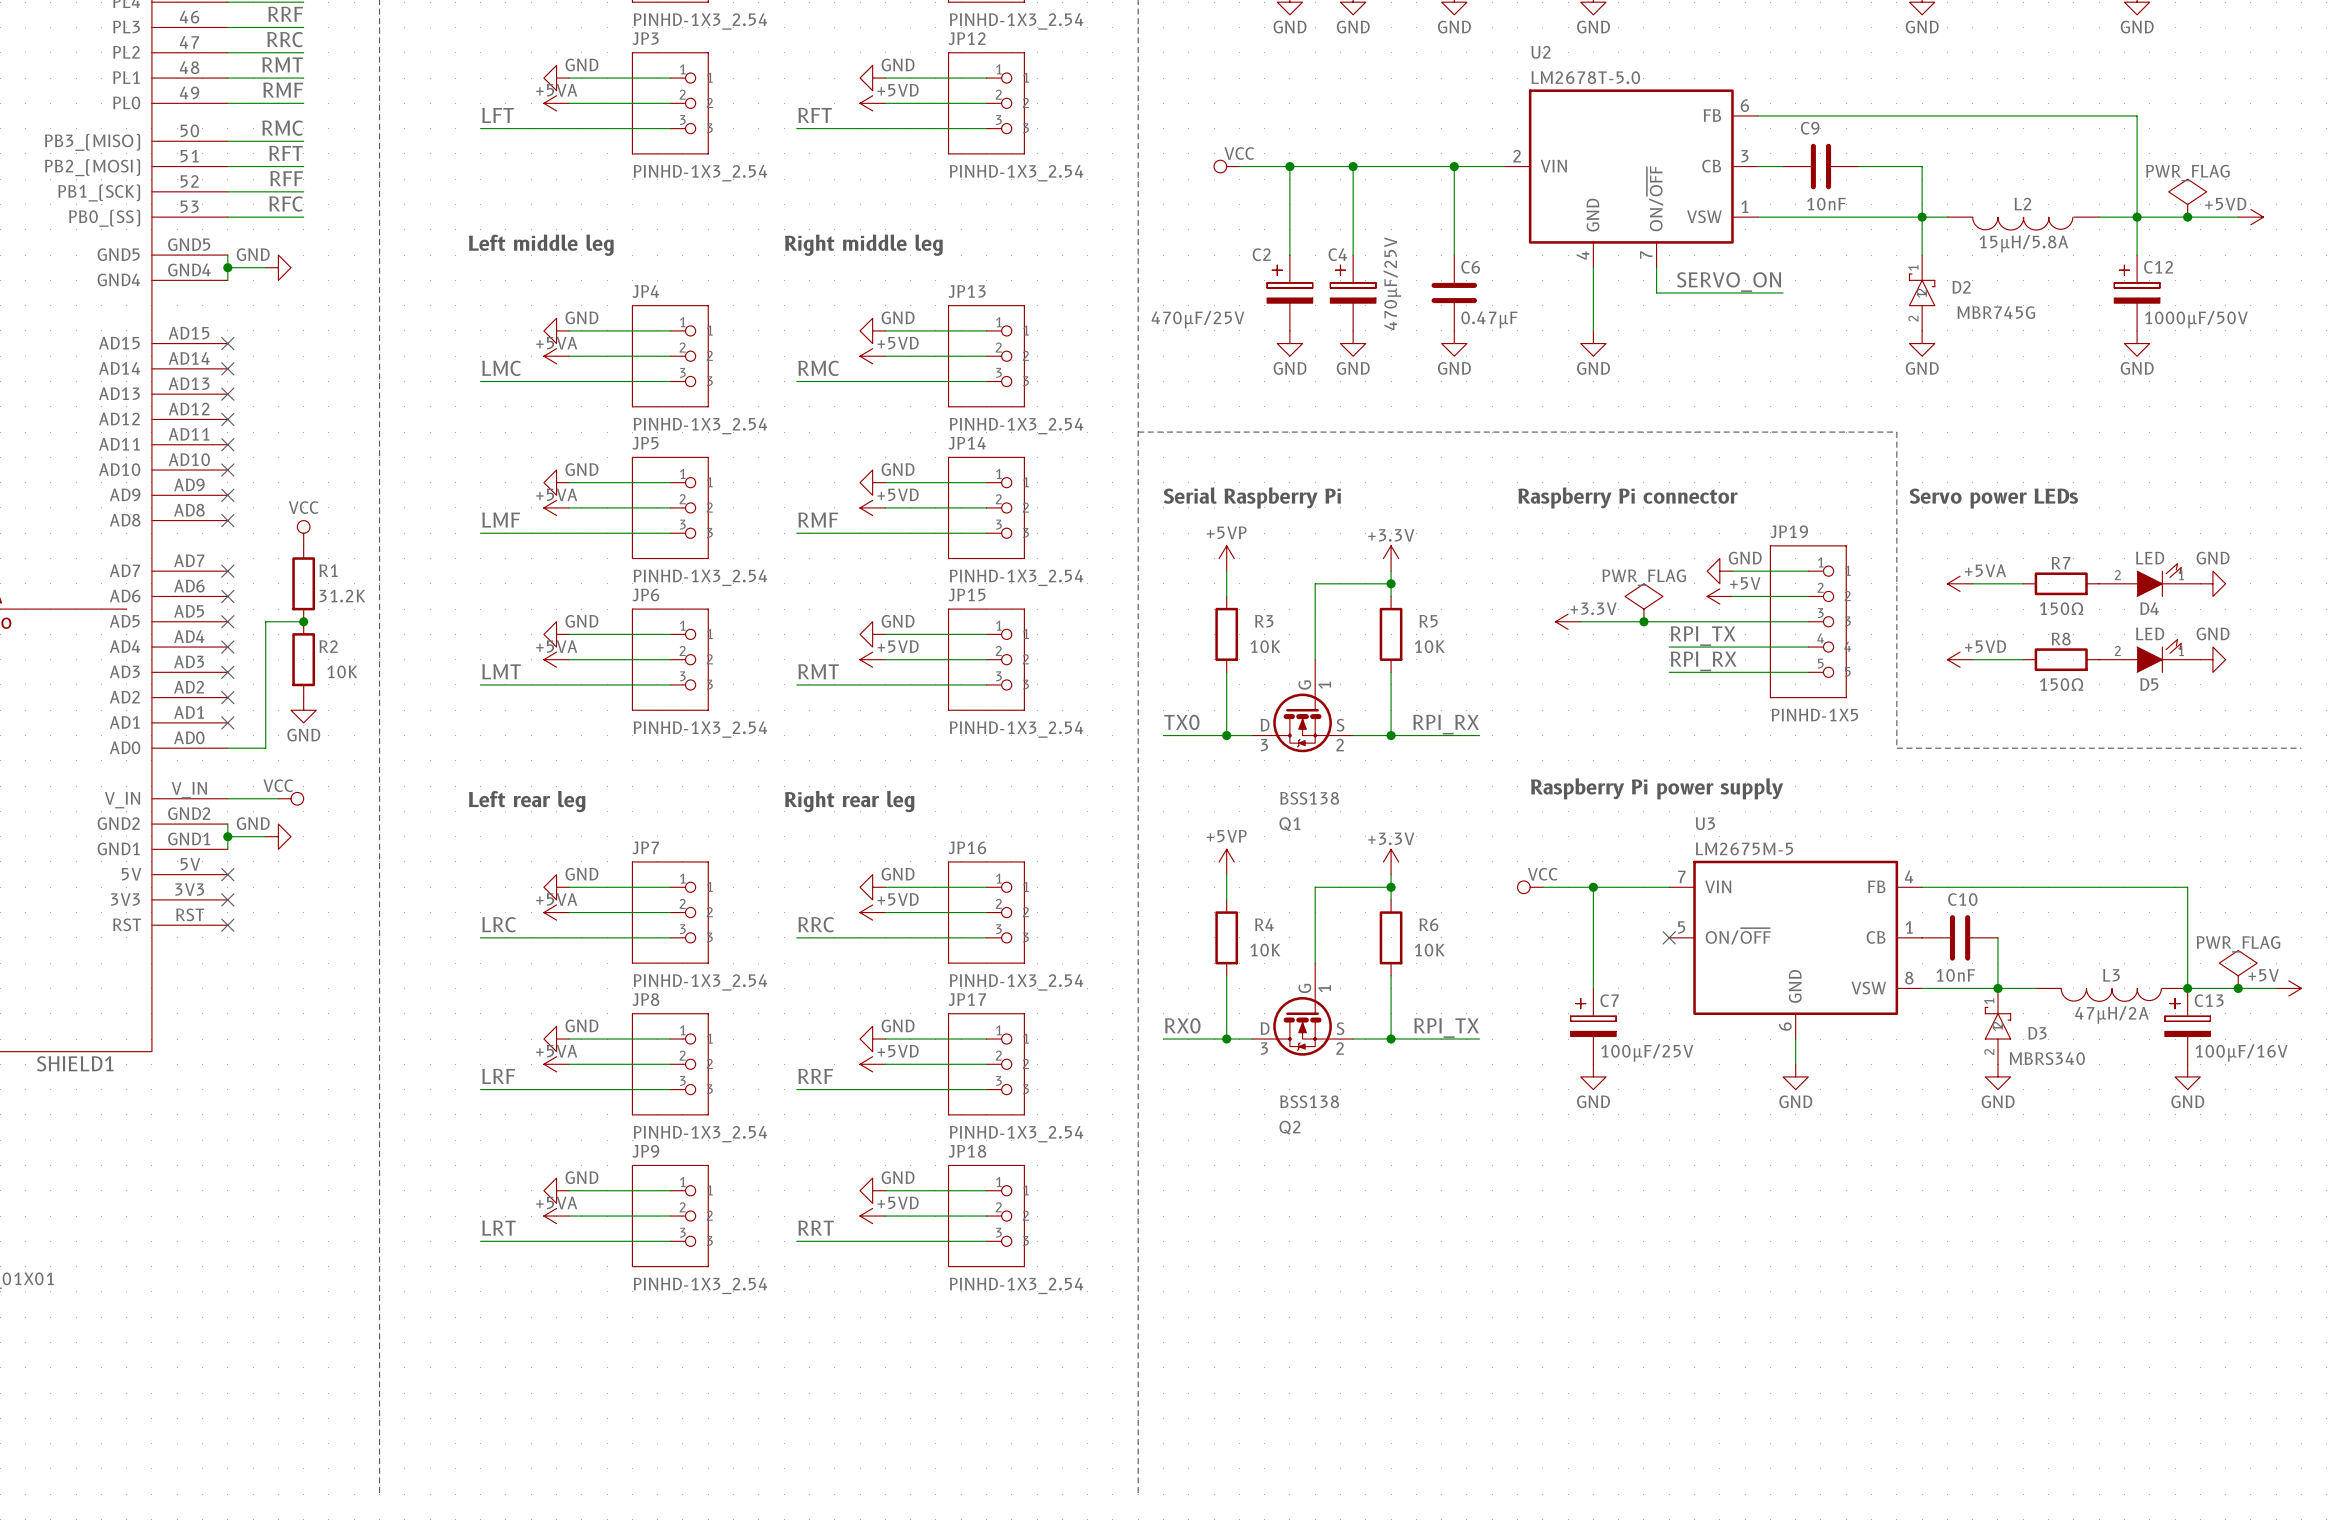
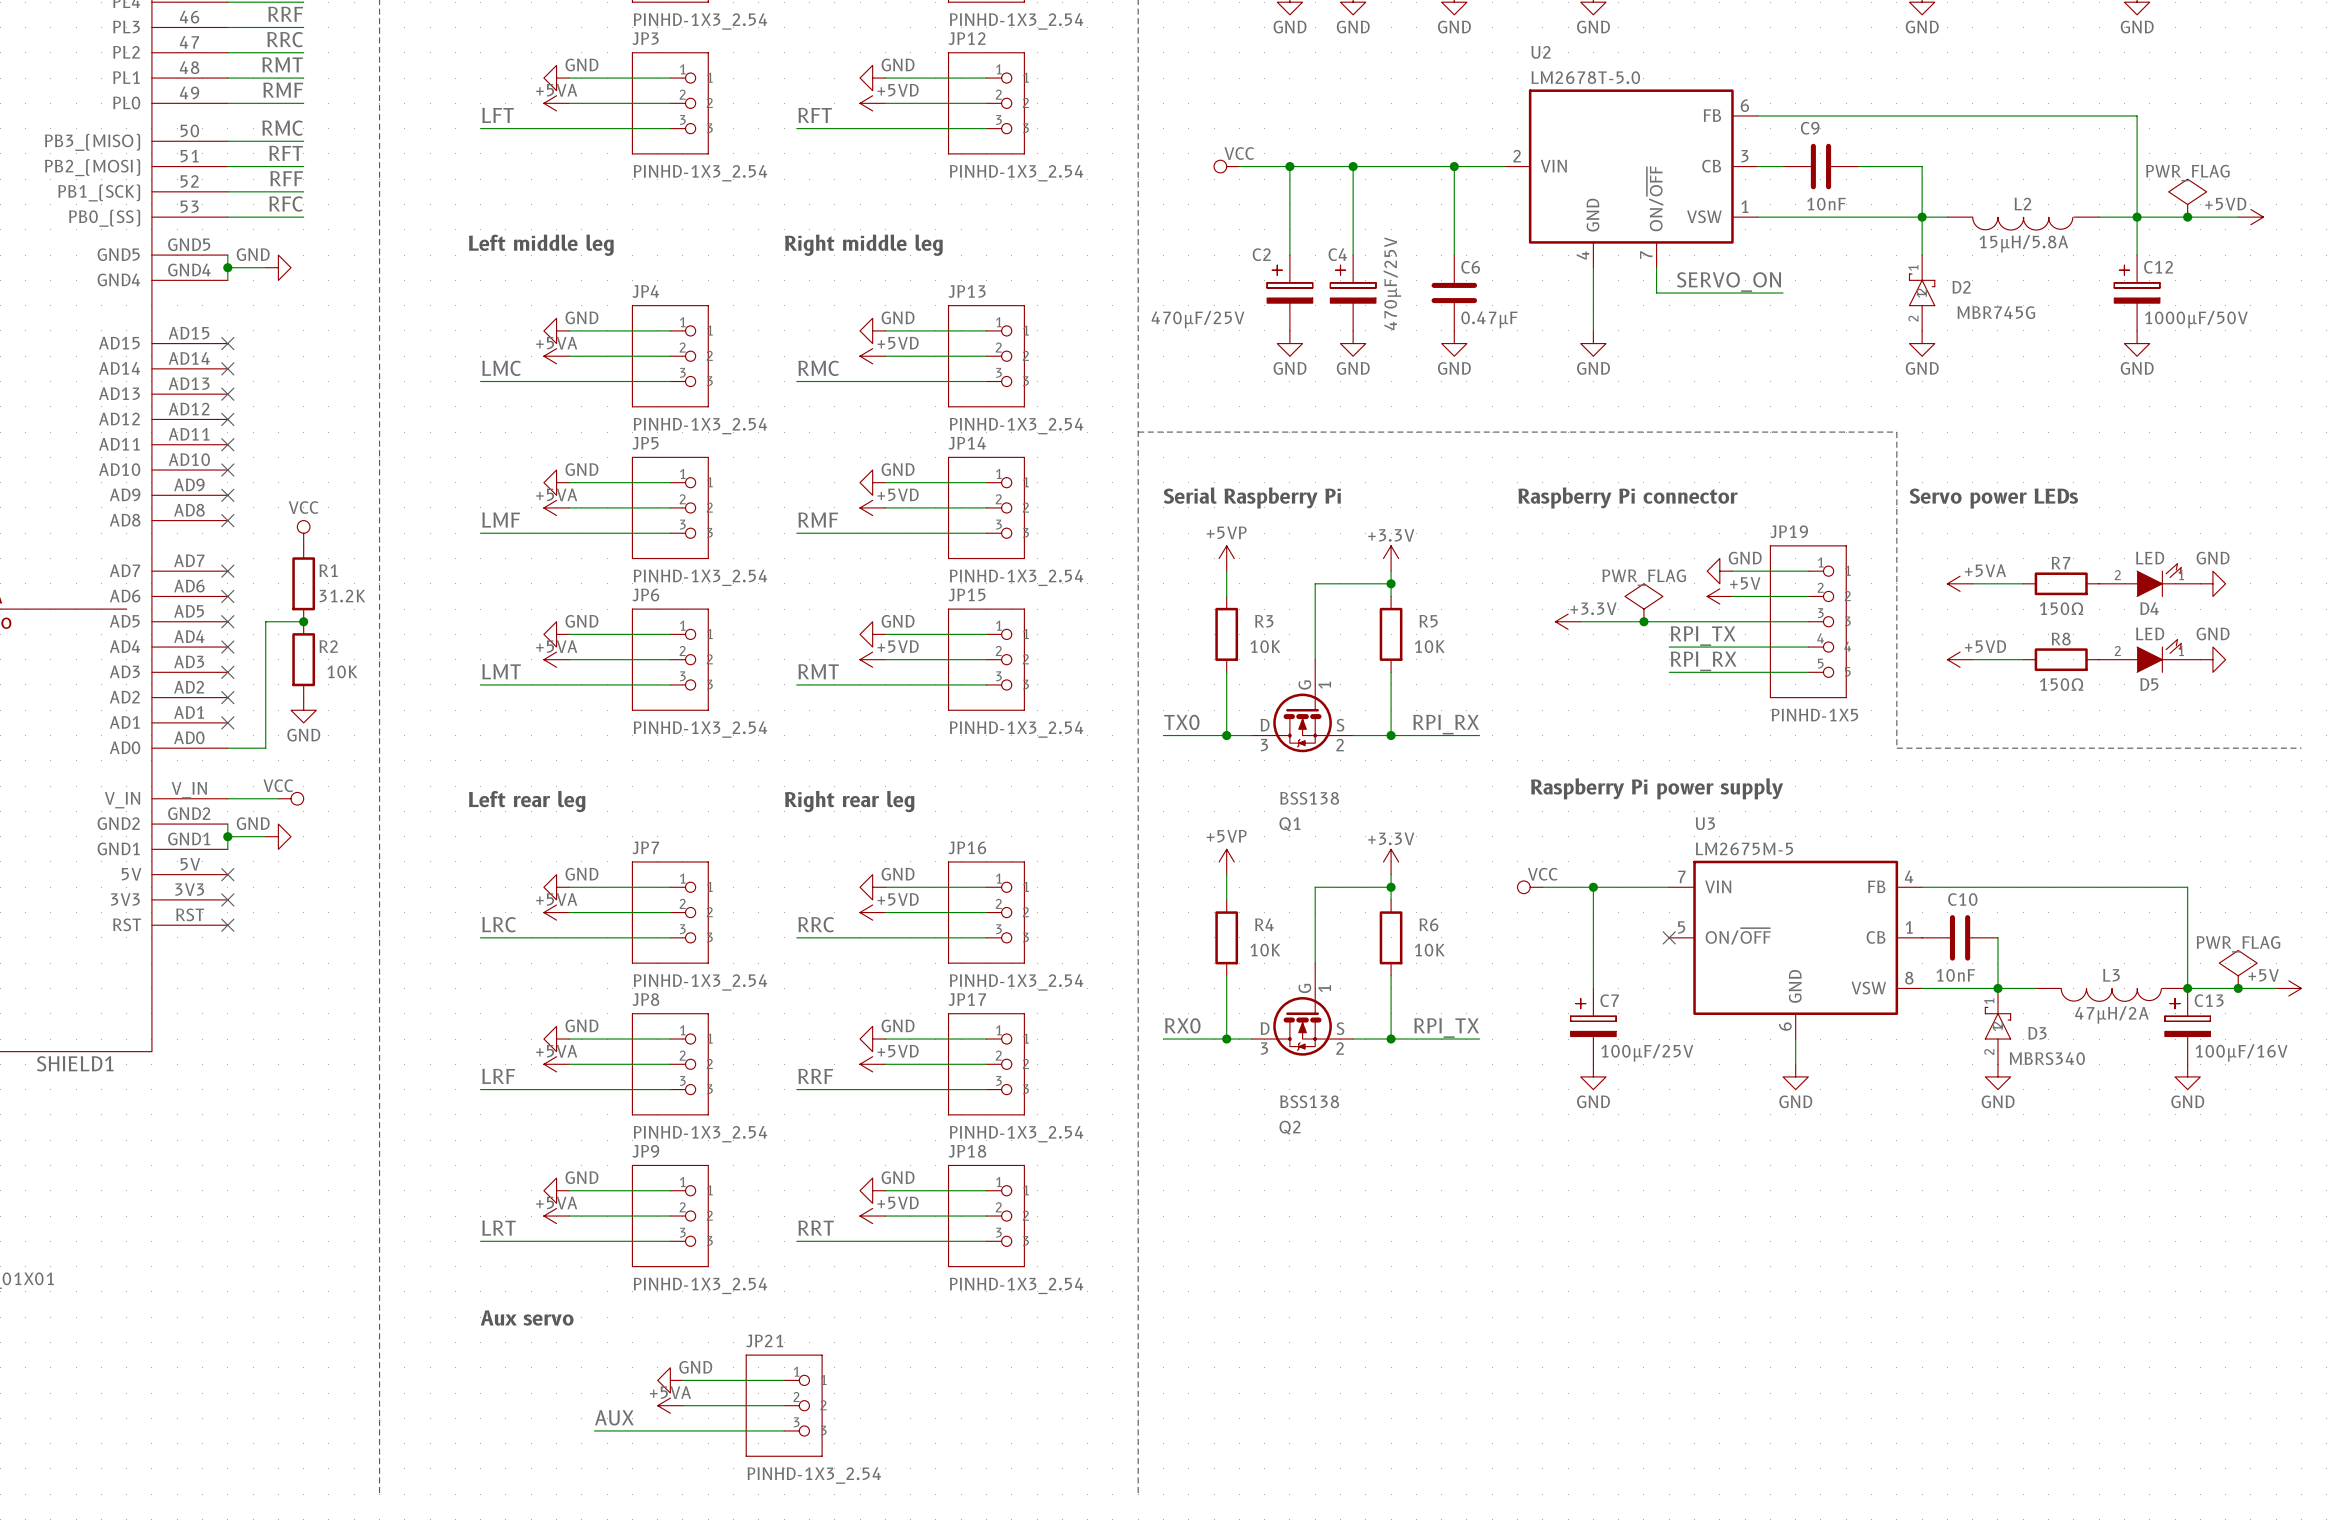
text: none -> Aux servo (527, 1318)
power symbol: none -> GND (670, 1380)
wire: none -> (682, 1380) (784, 1380)
power symbol: none -> +5VA (670, 1405)
wire: none -> (682, 1405) (784, 1405)
JP21: none -> PINHD-1X3_2.54 (784, 1405)
label: none -> AUX (614, 1417)
wire: none -> (594, 1430) (784, 1430)

